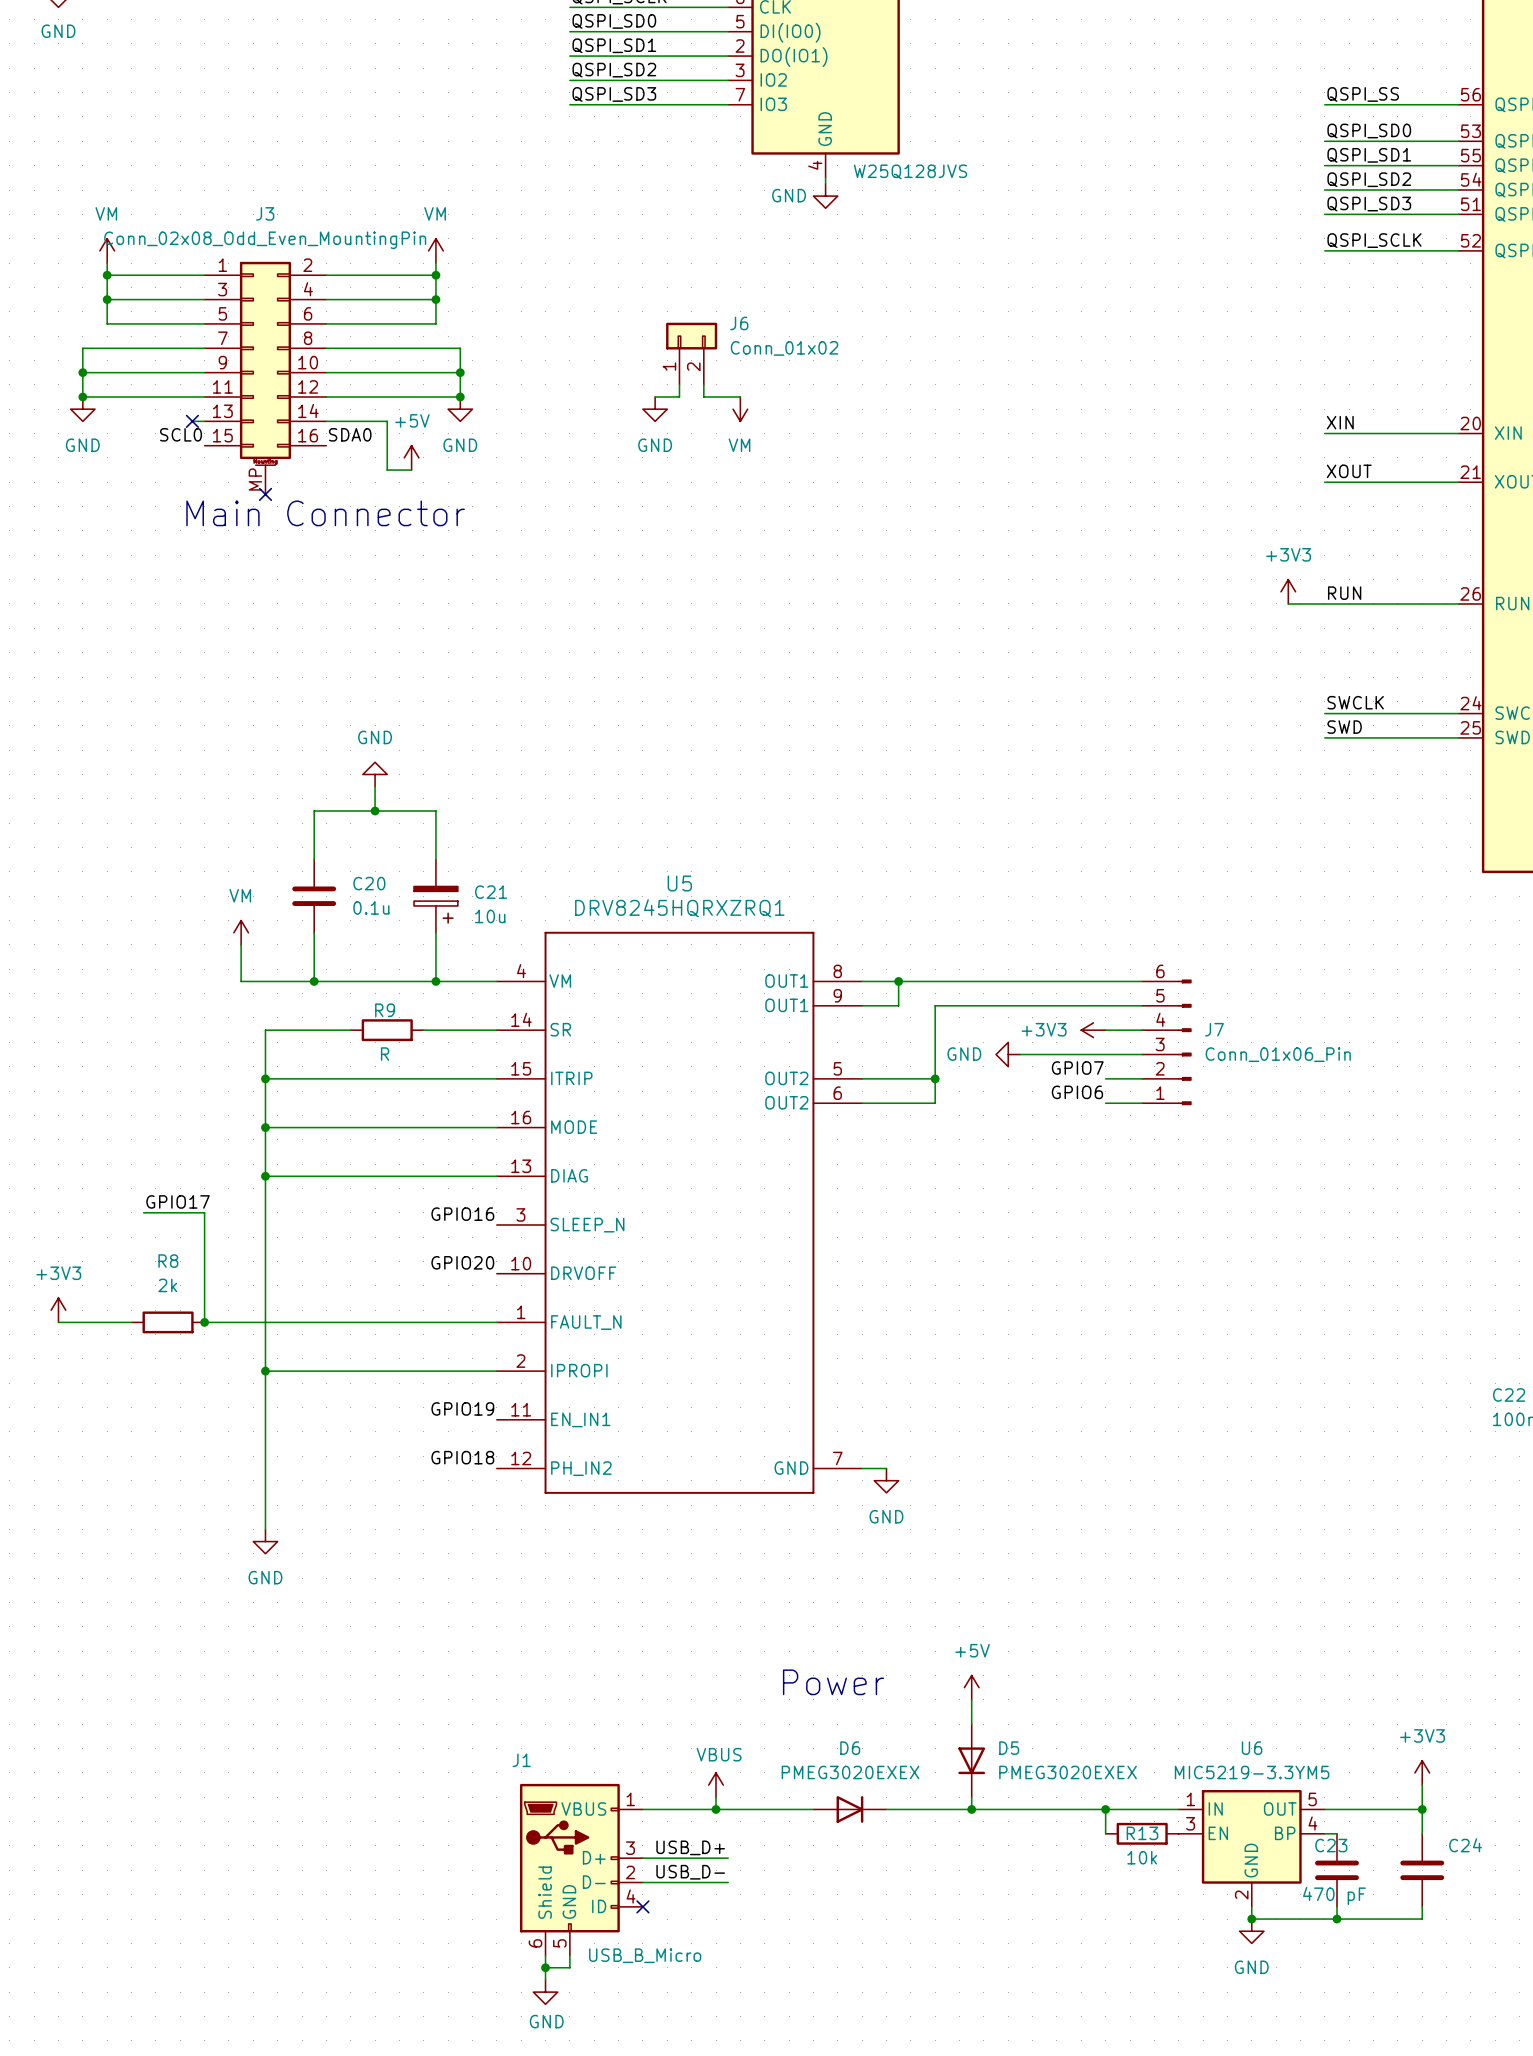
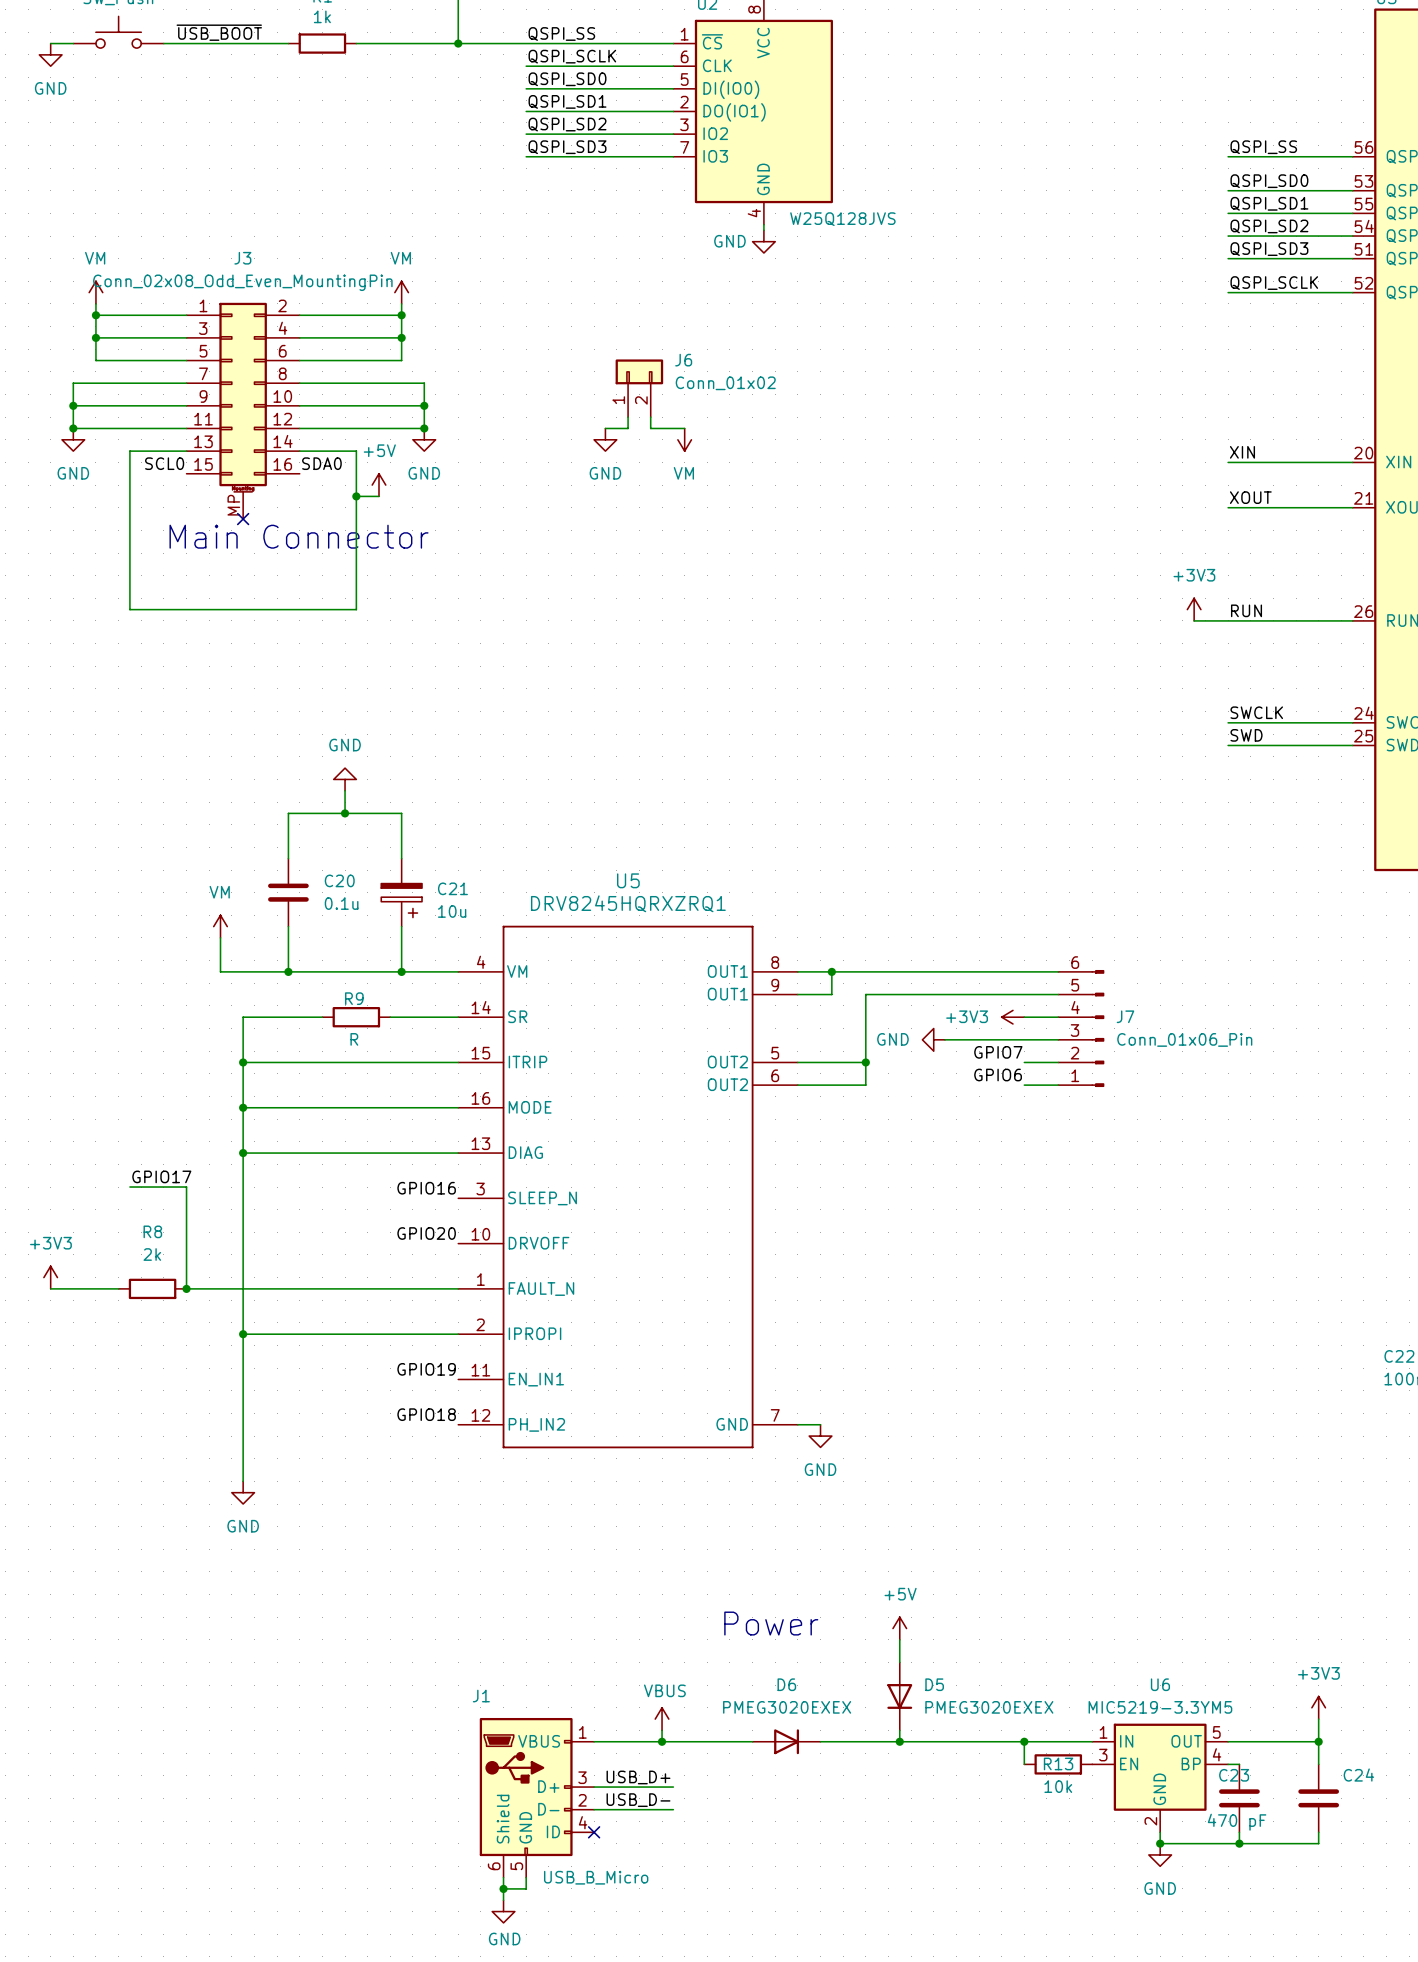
wire: none -> (175, 451) (129, 451) (129, 609) (356, 609) (356, 496)
no-connect mark: (192, 421) -> none
junction: none -> (356, 496)

